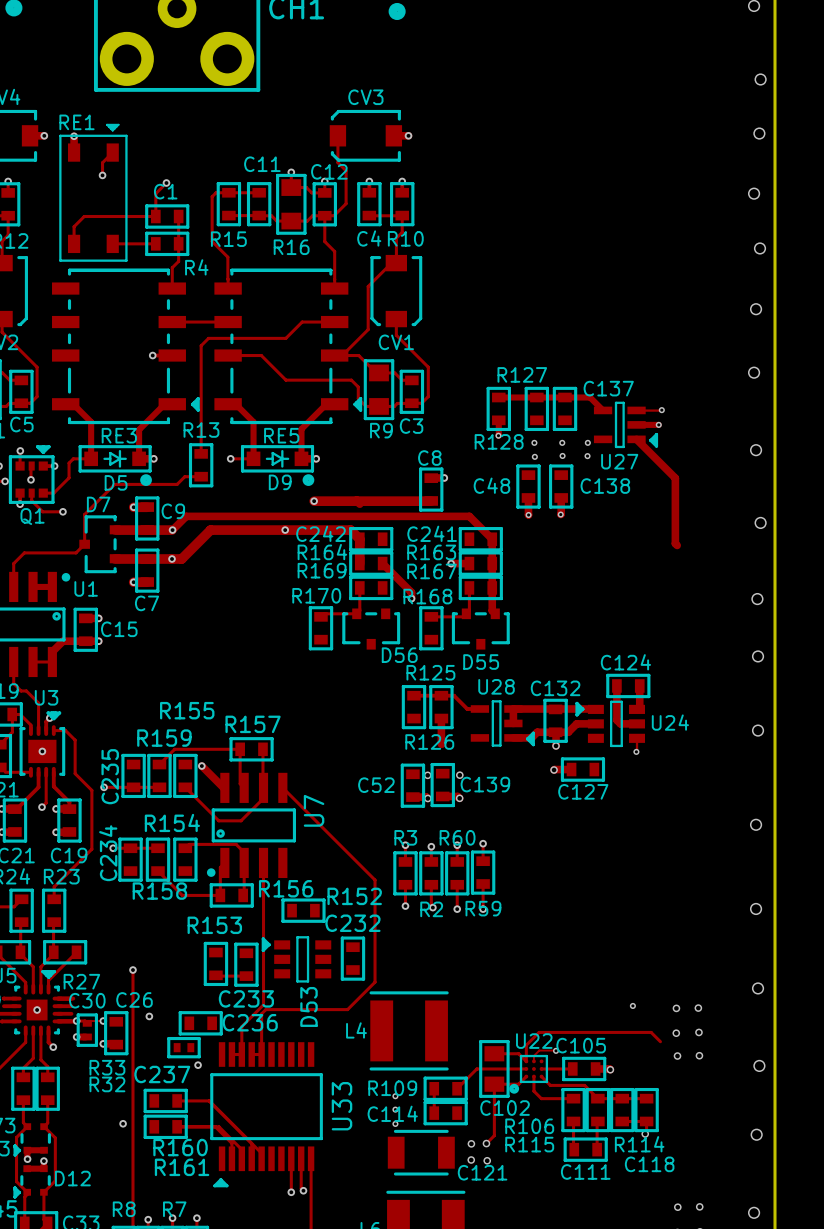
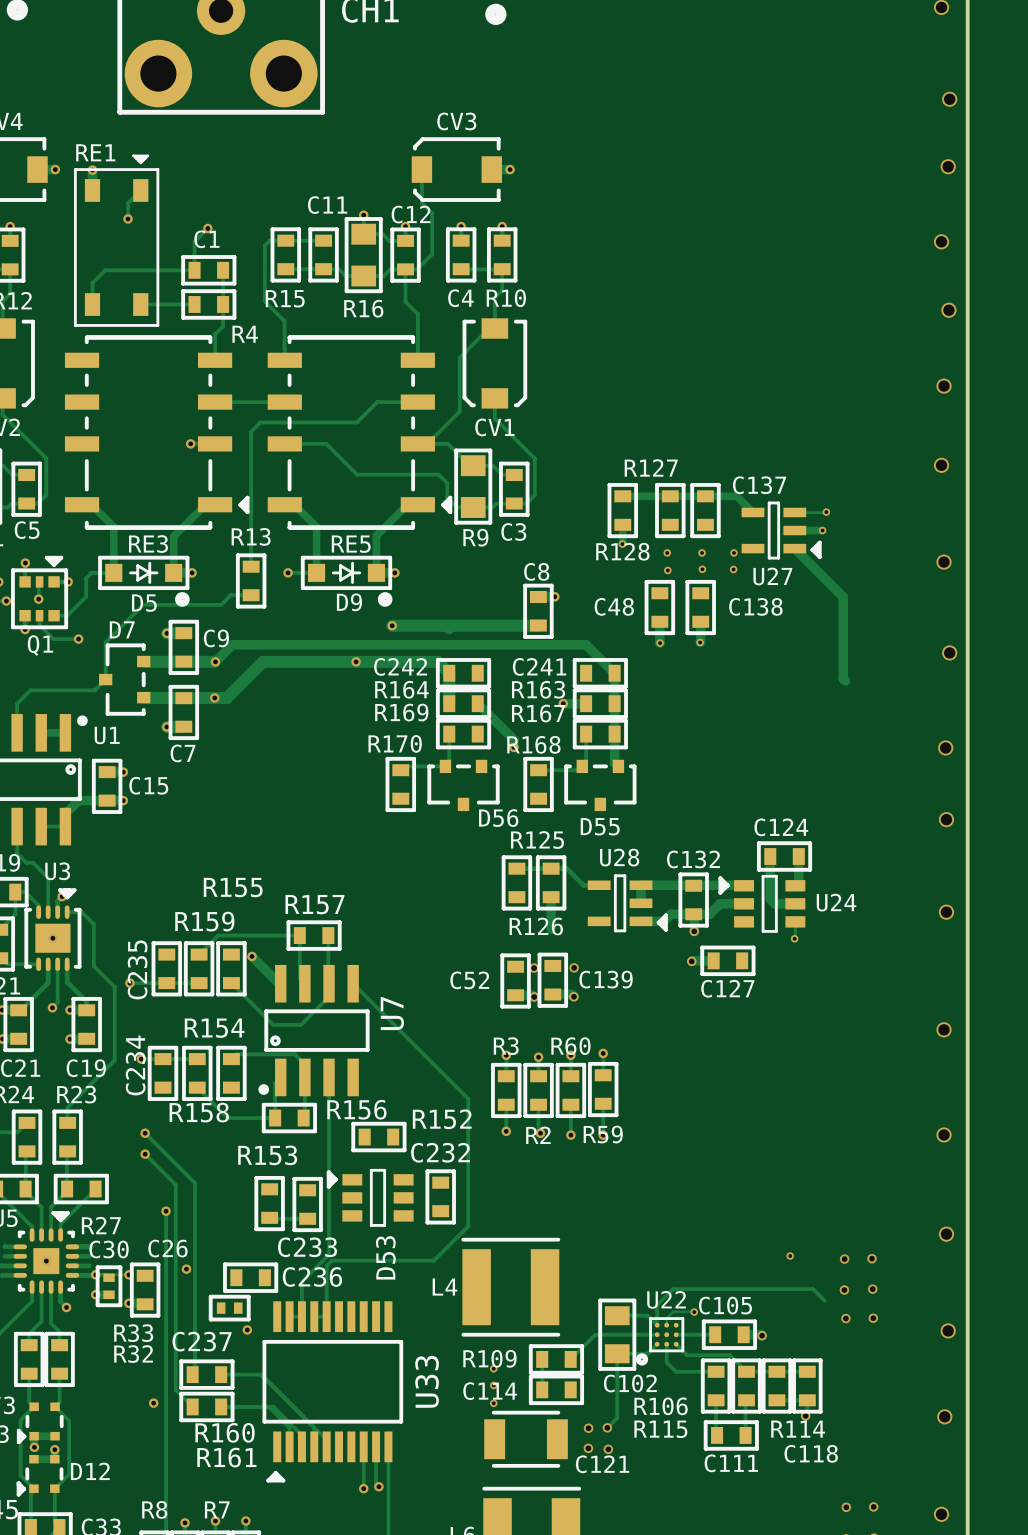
track: none -> (145, 1133) (195, 1183) (195, 1372) (192, 1374)
via: none -> (145, 1133)
track: none -> (145, 1154) (175, 1184) (175, 1390) (192, 1406)
via: none -> (145, 1154)

